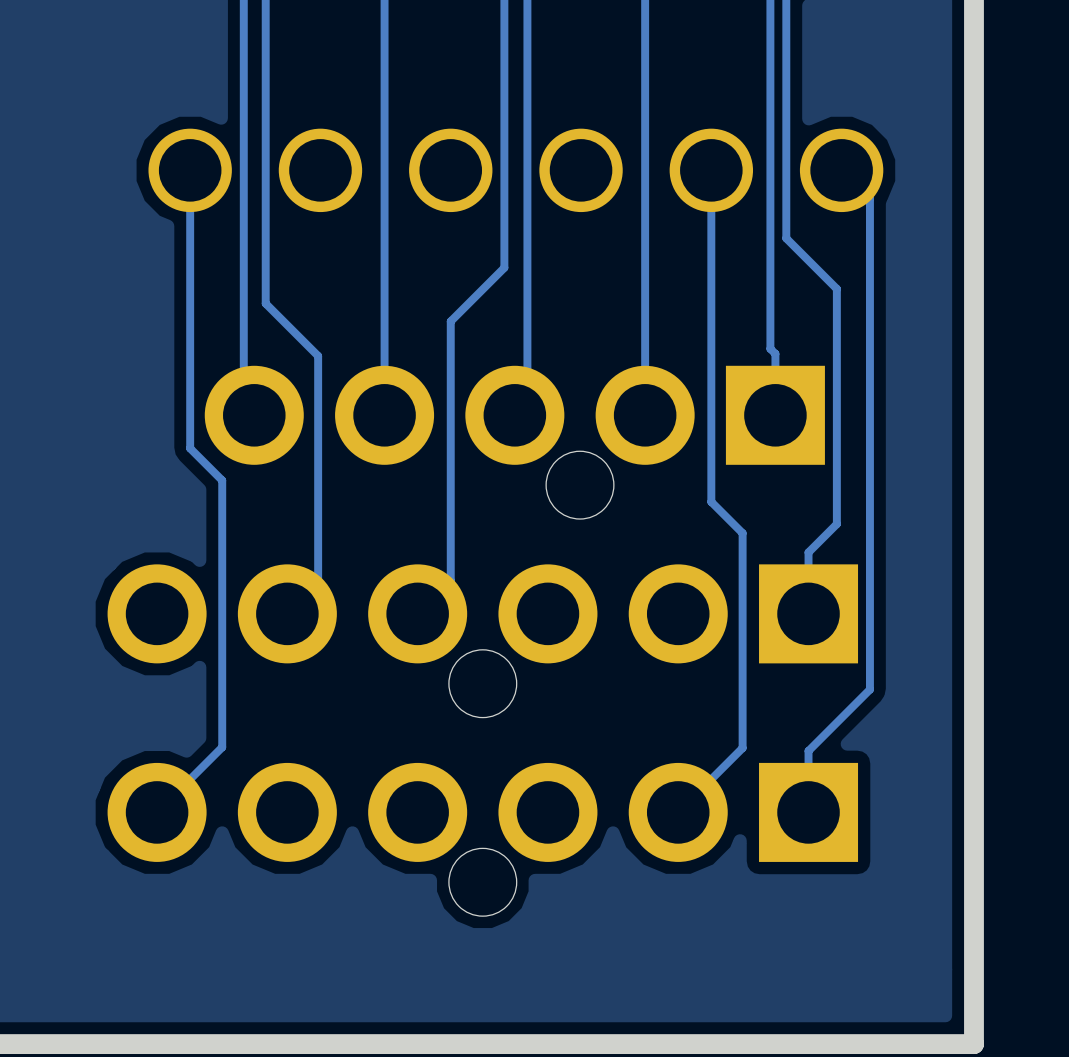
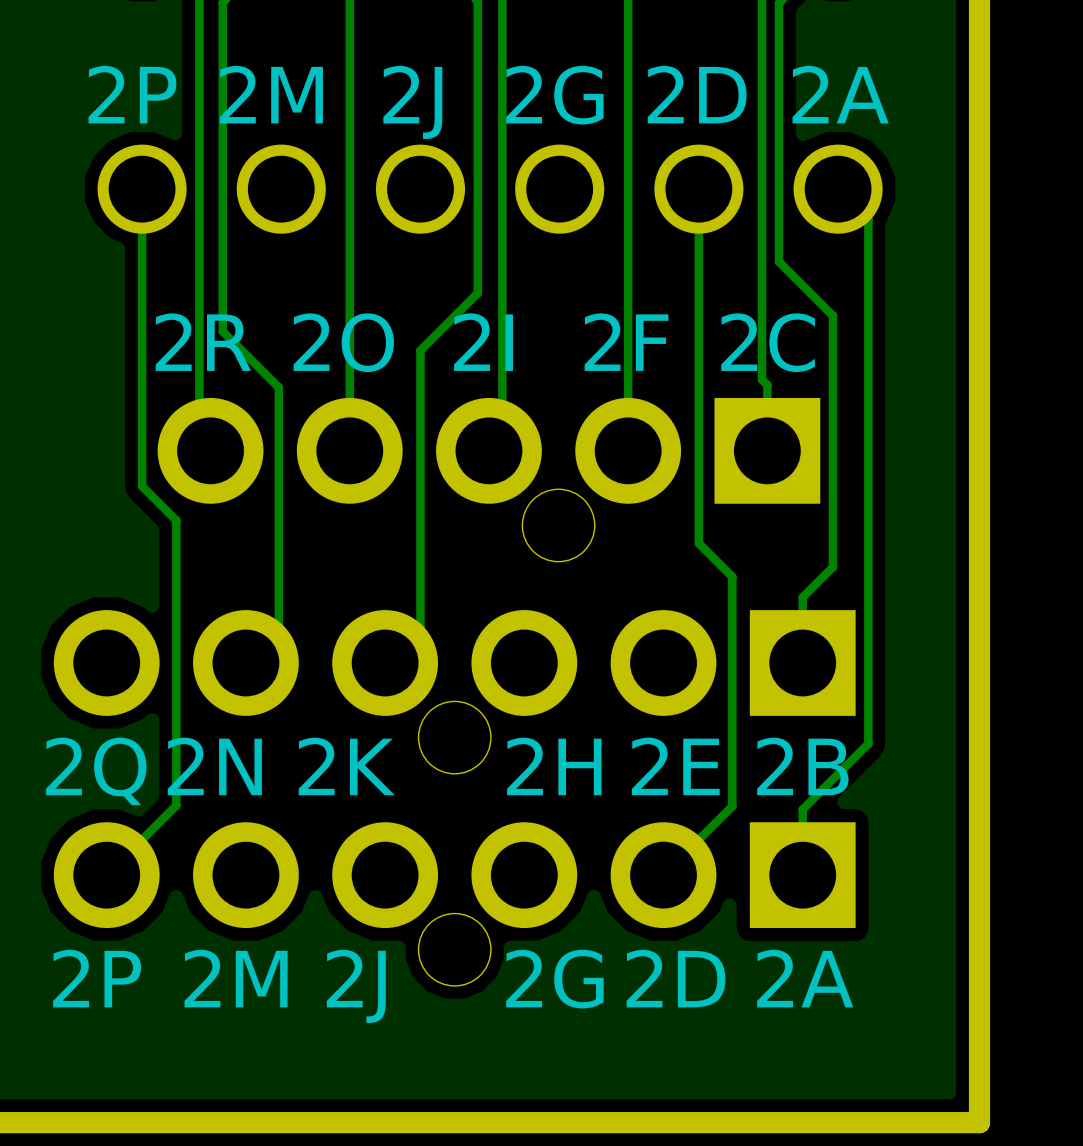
text: none -> 2P (132, 94)
text: none -> 2M (271, 94)
text: none -> 2J (412, 102)
text: none -> 2G (554, 95)
text: none -> 2D (697, 94)
text: none -> 2A (840, 94)
text: none -> 2R (203, 342)
text: none -> 2O (343, 342)
text: none -> 2I (483, 342)
text: none -> 2F (626, 342)
text: none -> 2C (768, 342)
text: none -> 2N (214, 766)
text: none -> 2K (346, 766)
text: none -> 2H (554, 766)
text: none -> 2E (675, 766)
text: none -> 2B (802, 766)
text: none -> 2Q (96, 771)
text: none -> 2P (97, 978)
text: none -> 2M (236, 978)
text: none -> 2J (356, 986)
text: none -> 2G (554, 979)
text: none -> 2D (675, 978)
text: none -> 2A (805, 978)

